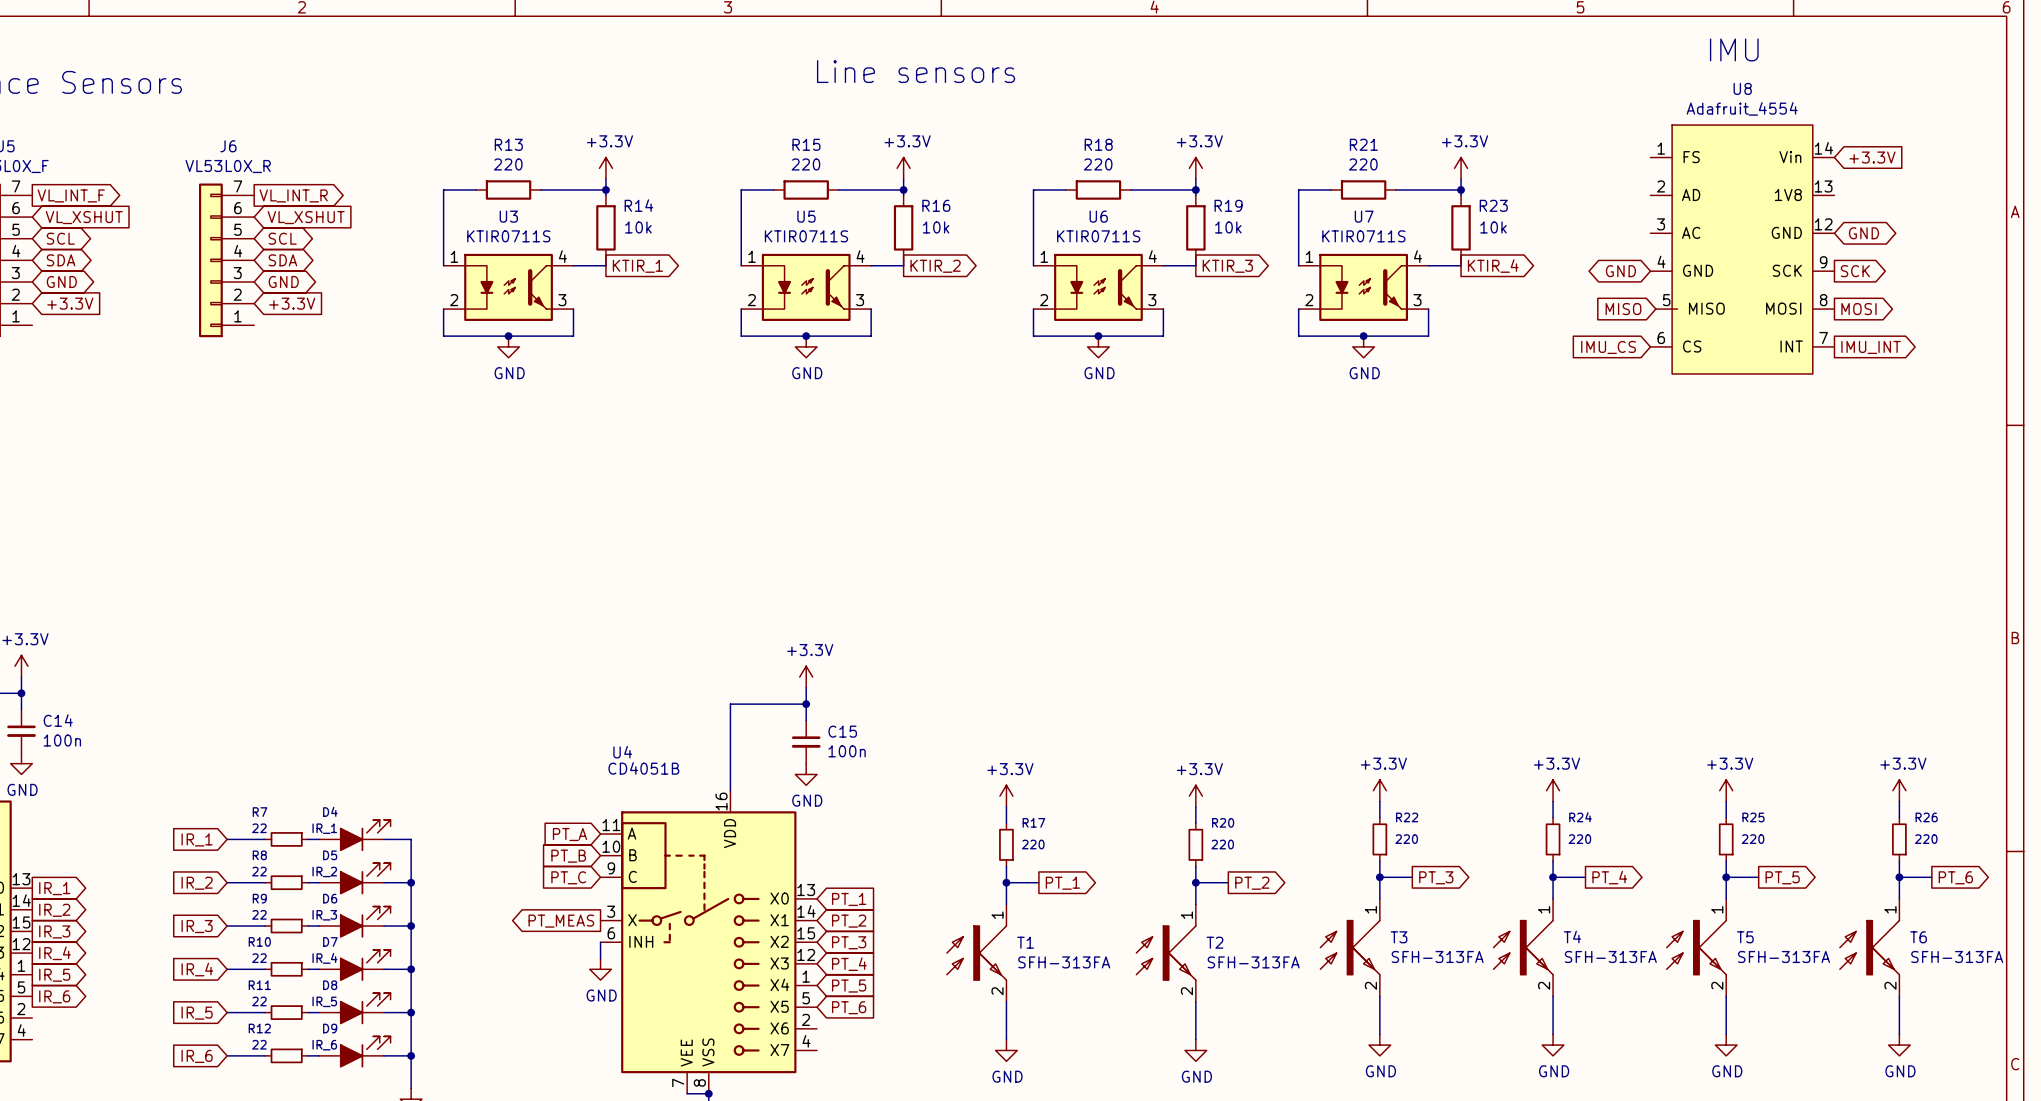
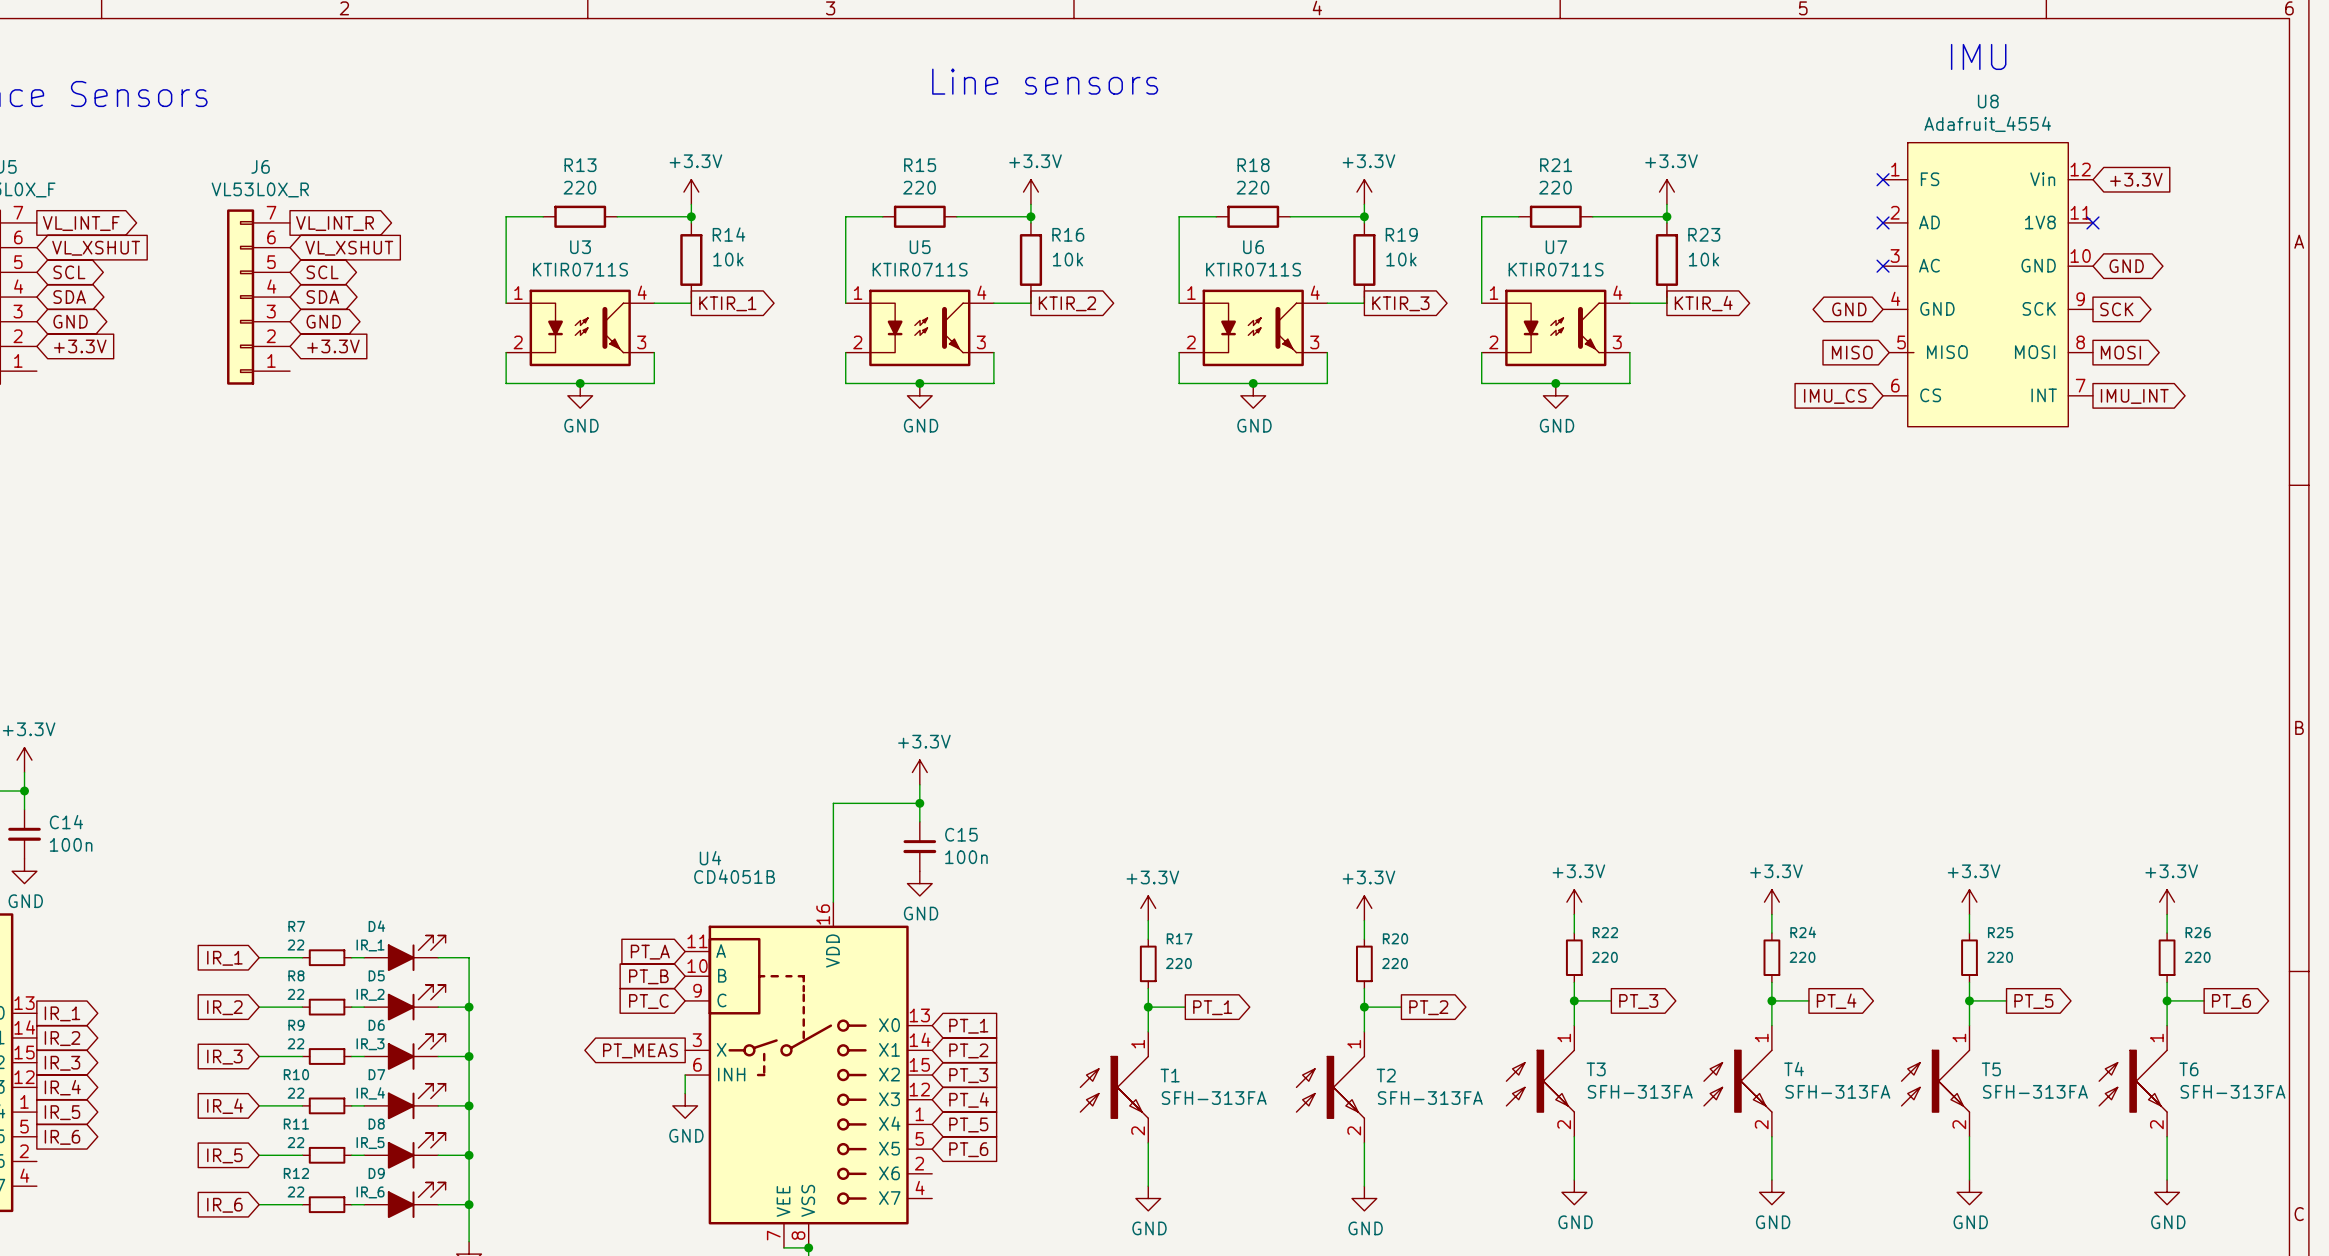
U8 pin number: 14 (1823, 148) -> 12 (2080, 169)
no-connect mark: none -> (1883, 179)
U8 pin number: 13 (1823, 186) -> 11 (2080, 212)
no-connect mark: none -> (1883, 222)
no-connect mark: none -> (2092, 222)
U8 pin number: 12 (1823, 224) -> 10 (2080, 255)
no-connect mark: none -> (1883, 266)

